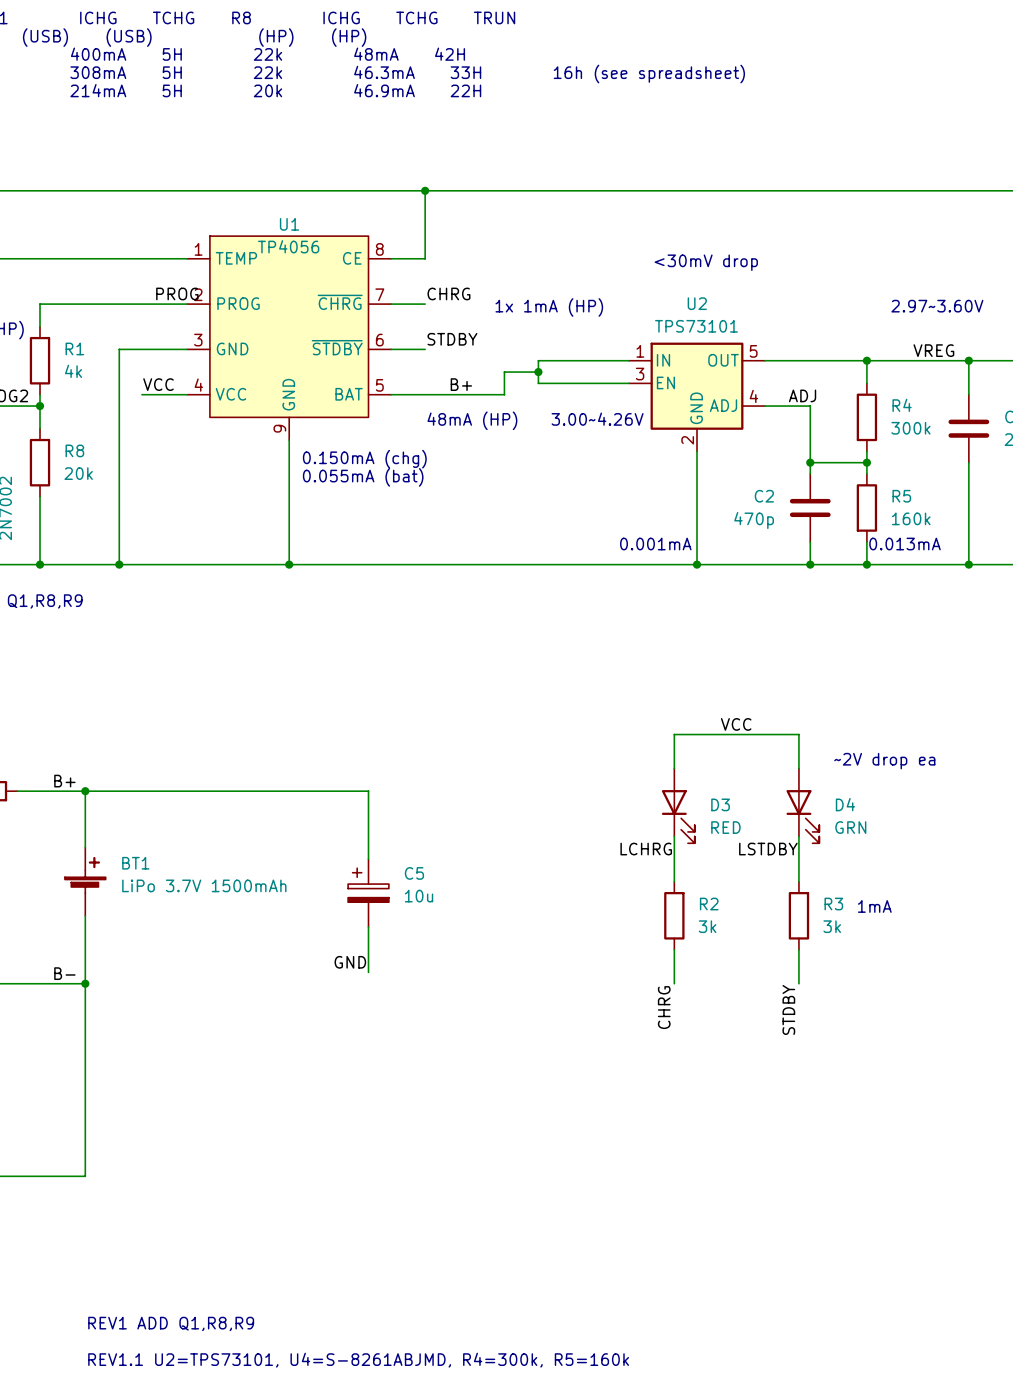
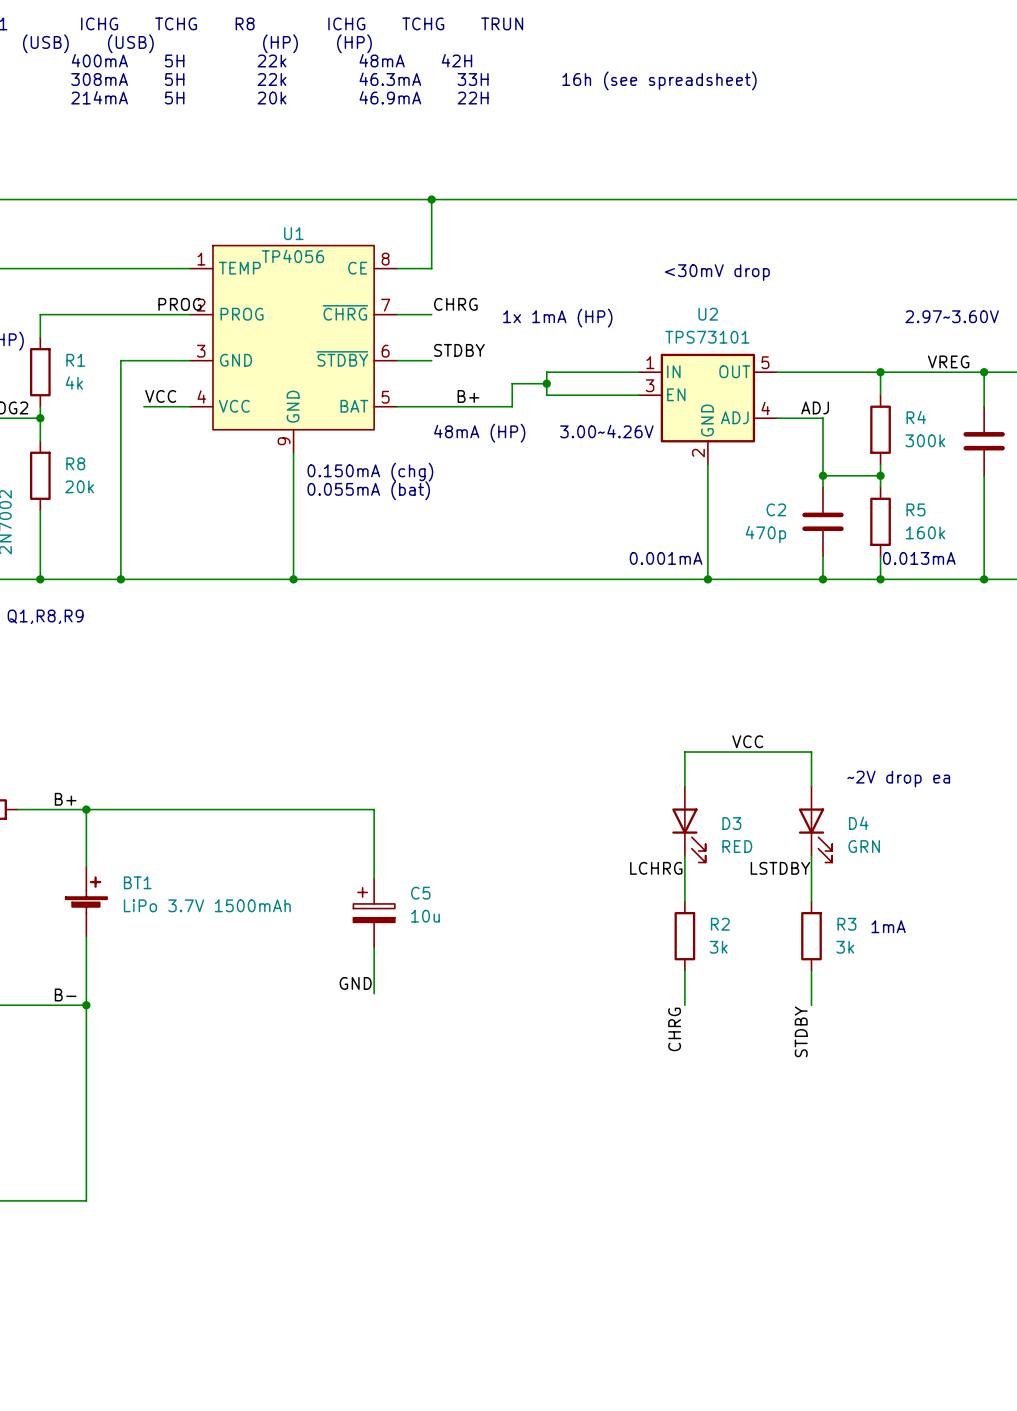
text: REV1 ADD Q1,R8,R9 (171, 1323) -> none
text: REV1.1 U2=TPS73101, U4=S-8261ABJMD, R4=300k, R5=160k (358, 1360) -> none

